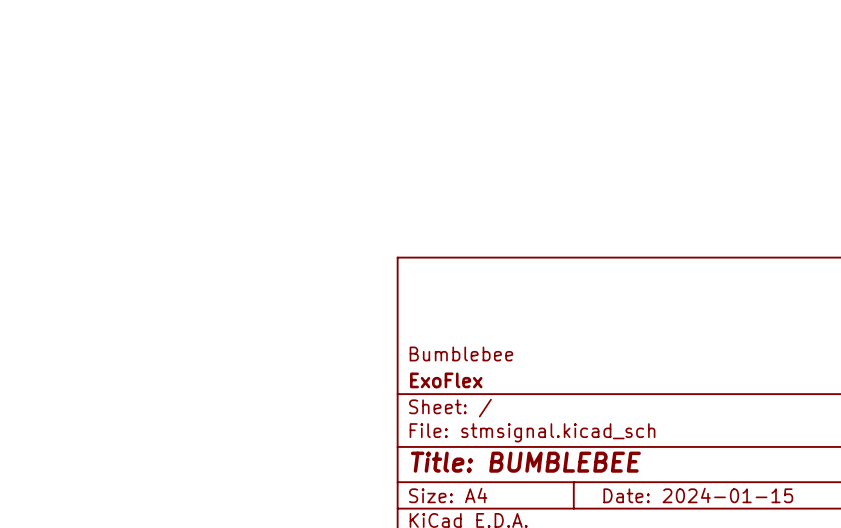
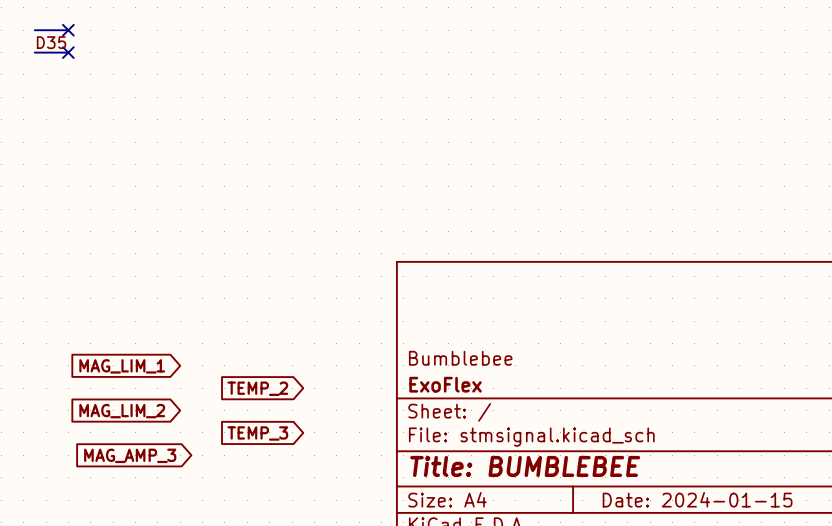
wire: none -> (34, 30) (68, 30)
no-connect mark: none -> (68, 30)
label: none -> D35 (51, 42)
wire: none -> (34, 52) (68, 52)
no-connect mark: none -> (68, 52)
global label: none -> MAG_LIM_1 (122, 366)
global label: none -> TEMP_2 (257, 388)
global label: none -> MAG_LIM_2 (122, 411)
global label: none -> TEMP_3 (257, 433)
global label: none -> MAG_AMP_3 (130, 455)

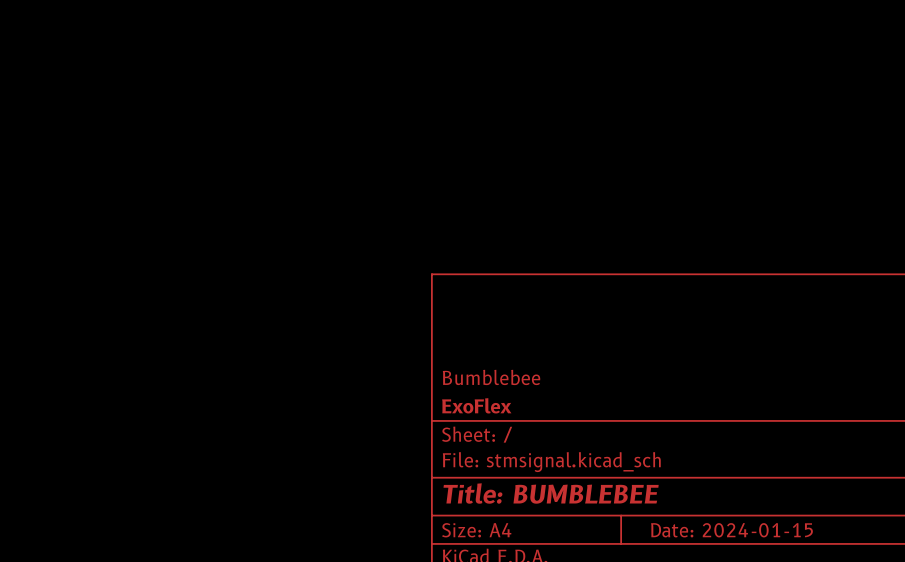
wire: (34, 30) (68, 30) -> none
no-connect mark: (68, 30) -> none
label: D35 (51, 42) -> none
wire: (34, 52) (68, 52) -> none
no-connect mark: (68, 52) -> none
global label: MAG_LIM_1 (122, 366) -> none
global label: TEMP_2 (257, 388) -> none
global label: MAG_LIM_2 (122, 411) -> none
global label: TEMP_3 (257, 433) -> none
global label: MAG_AMP_3 (130, 455) -> none

